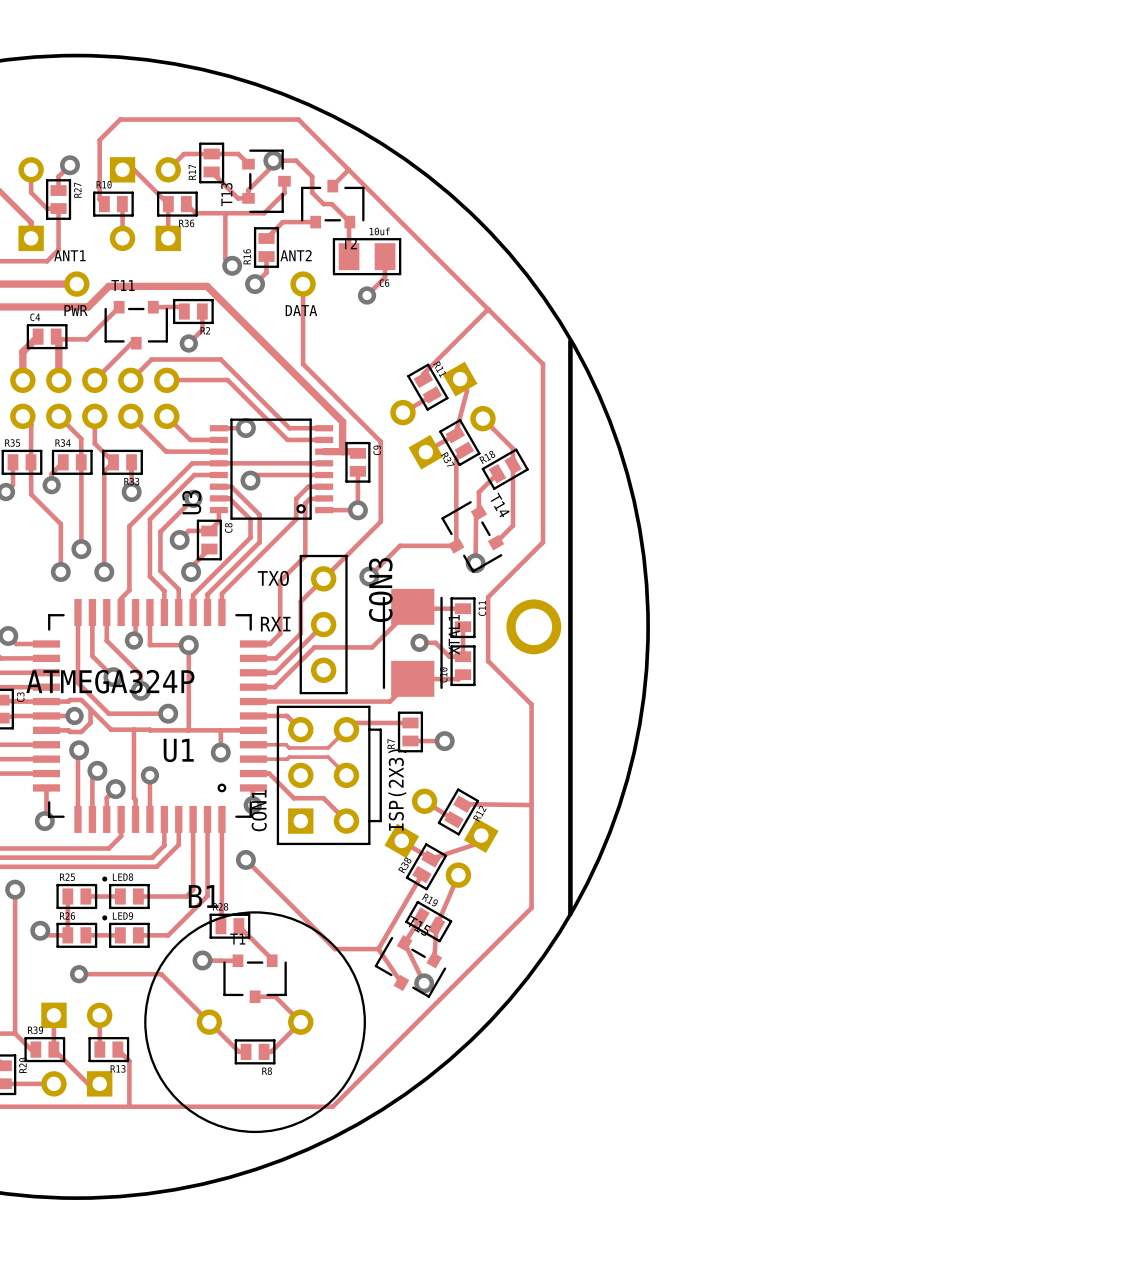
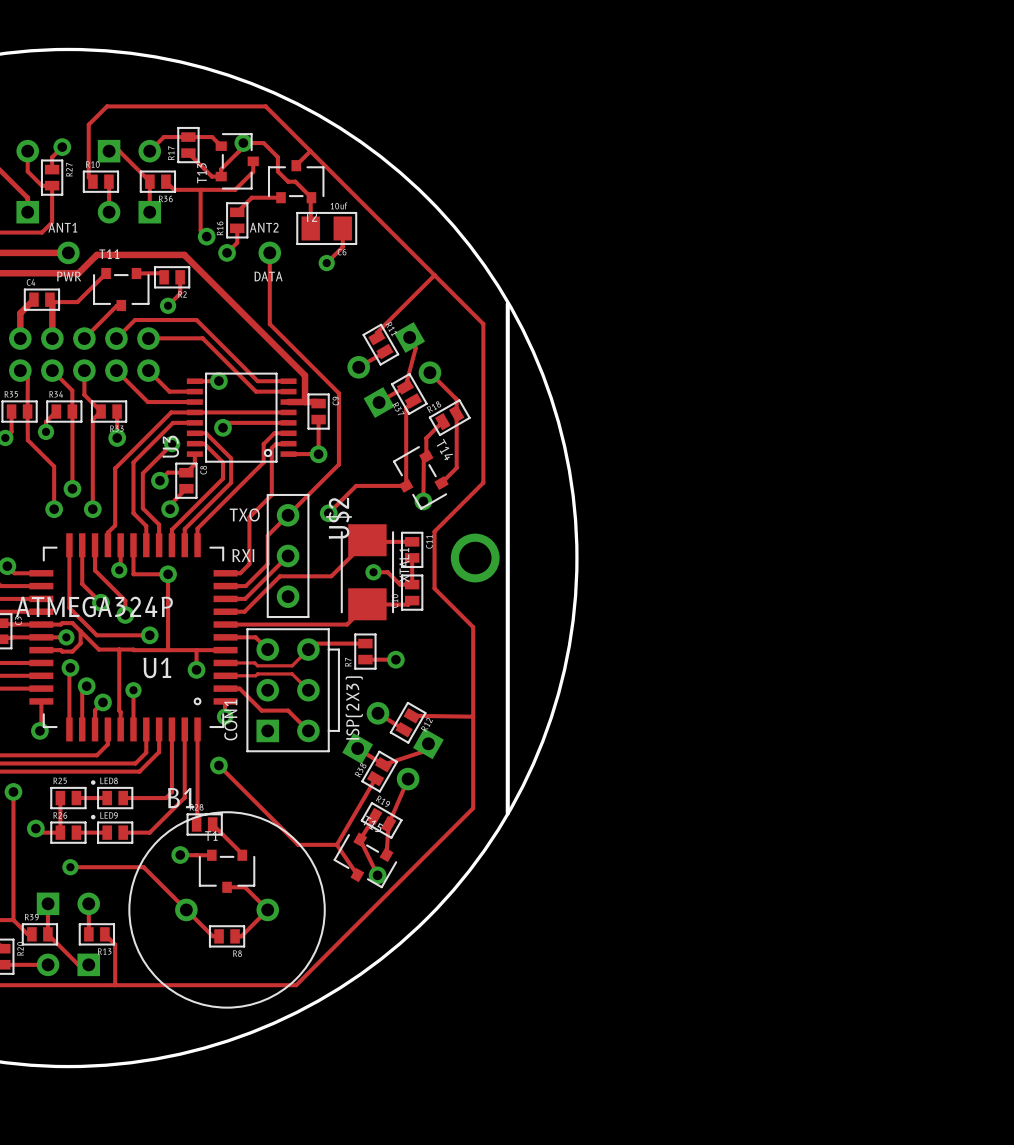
CON3 name: CON3 (380, 590) -> U$2 (338, 518)

